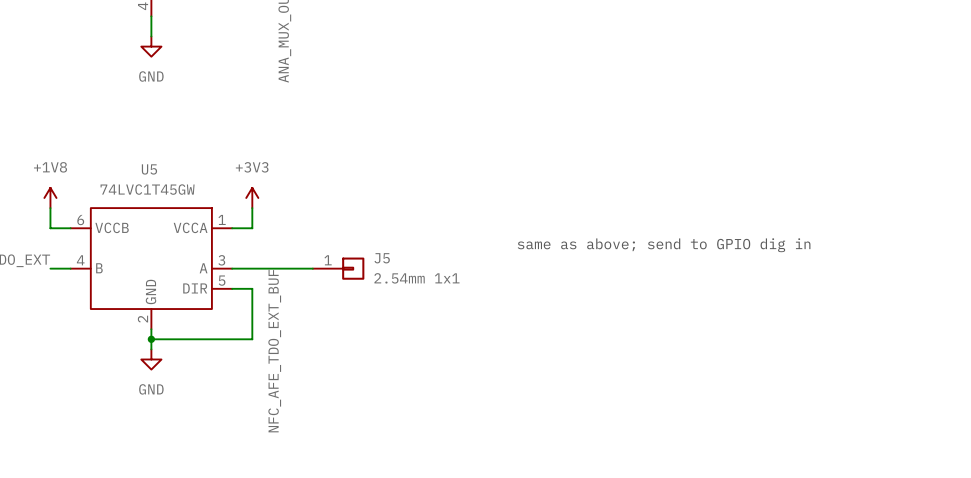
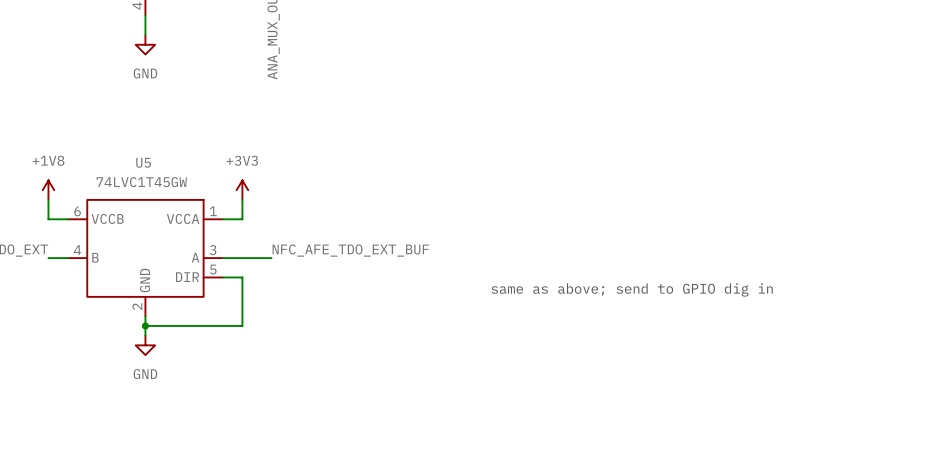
text position: same as above; send to GPIO dig in (664, 245) -> same as above; send to GPIO dig in (632, 289)
wire: (282, 268) (312, 268) -> none
J5: 2.54mm 1x1 (338, 268) -> none
label rotation: 0° (274, 351) -> 90° clockwise (350, 250)

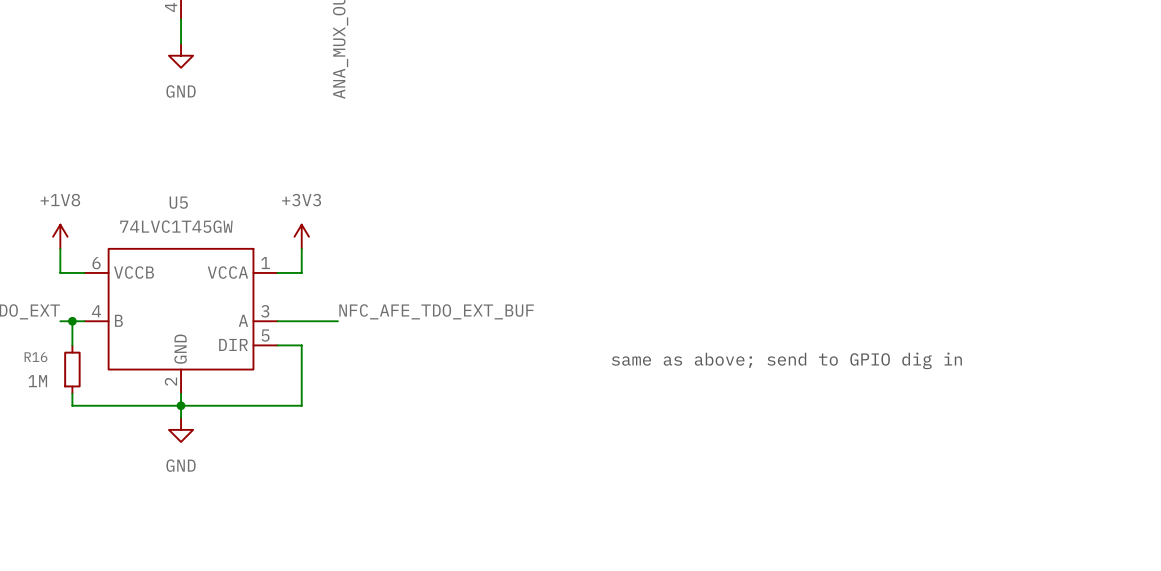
wire: none -> (72, 321) (72, 345)
junction: none -> (72, 321)
R16: none -> 1M (72, 369)
wire: none -> (72, 393) (72, 405) (181, 405)

